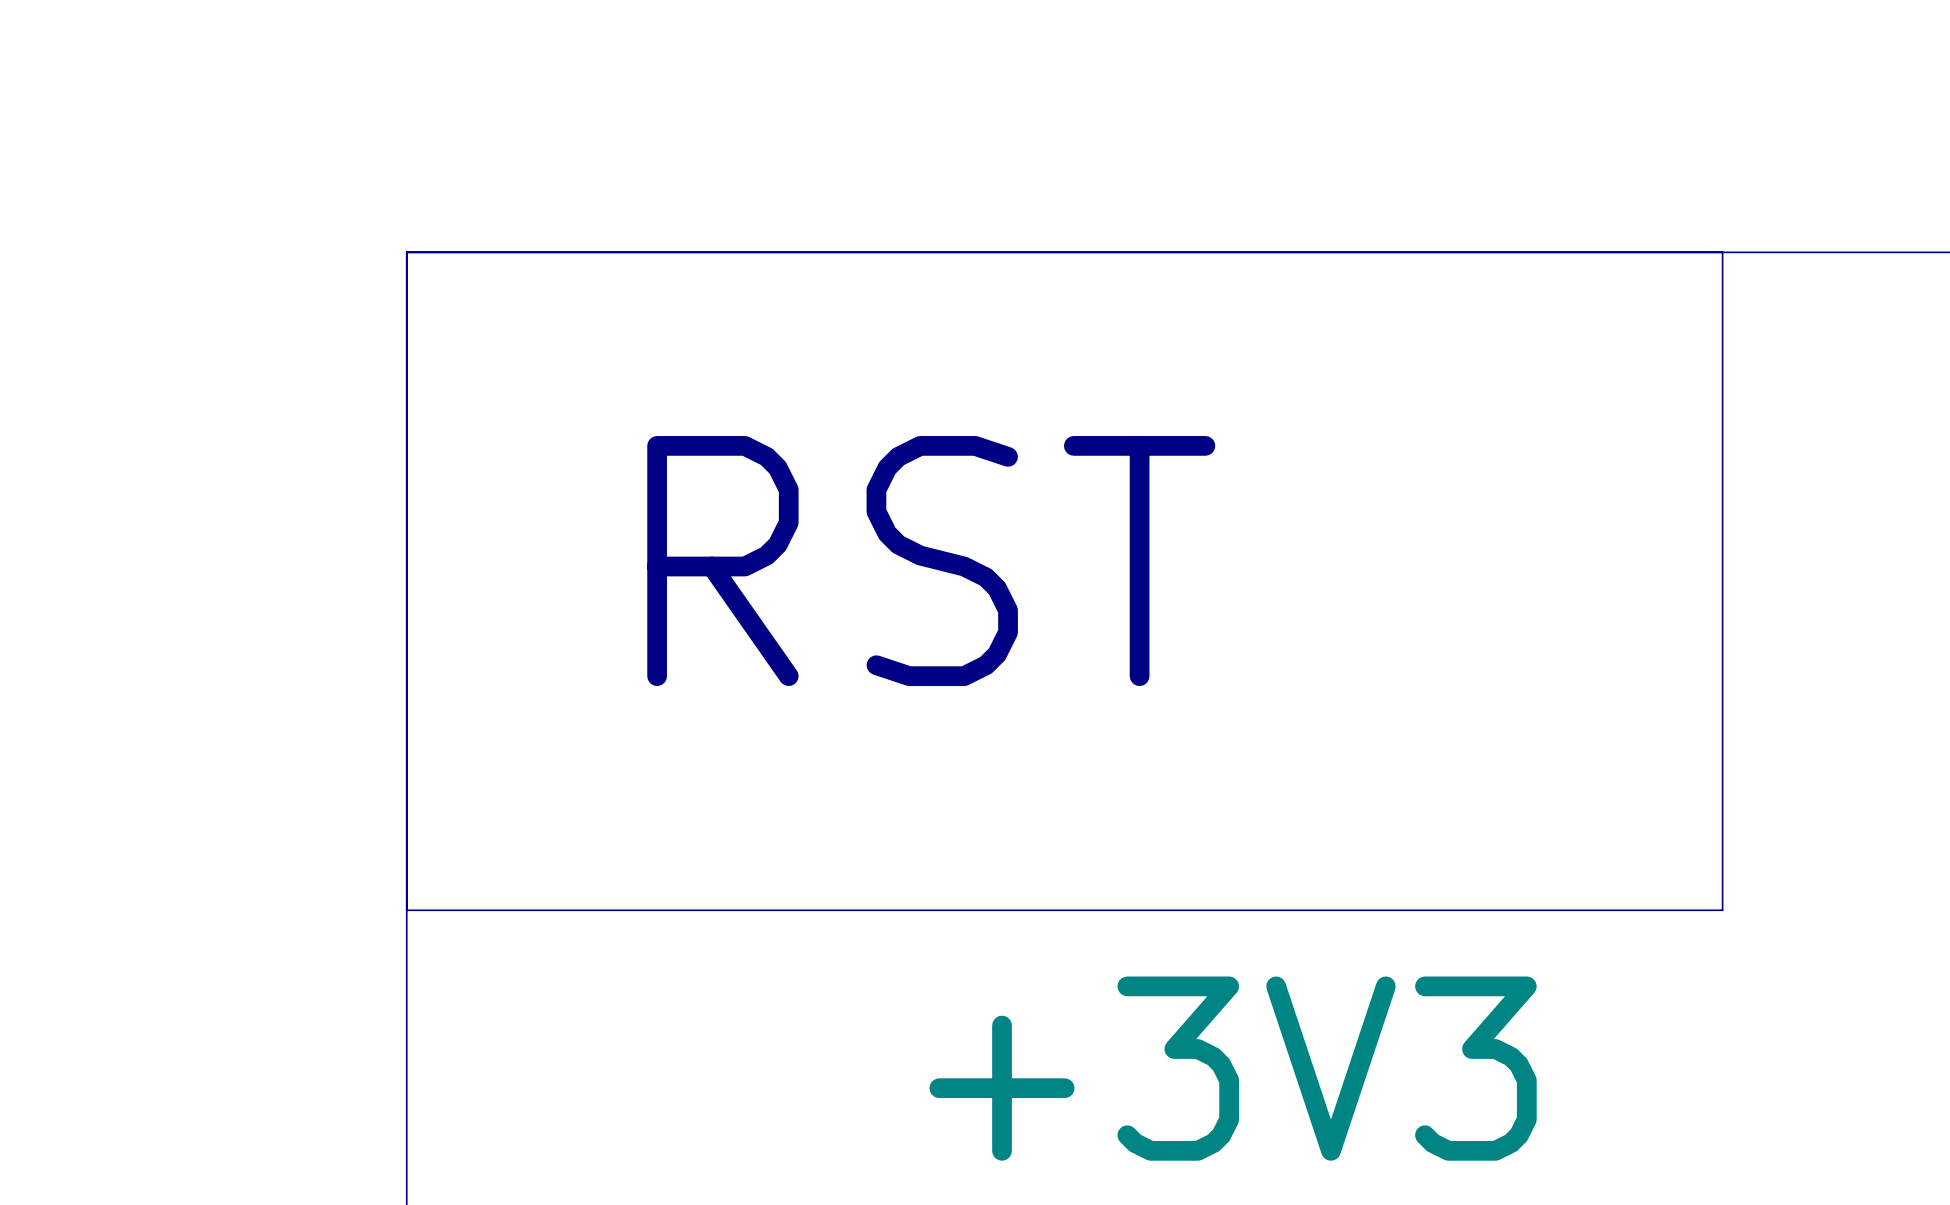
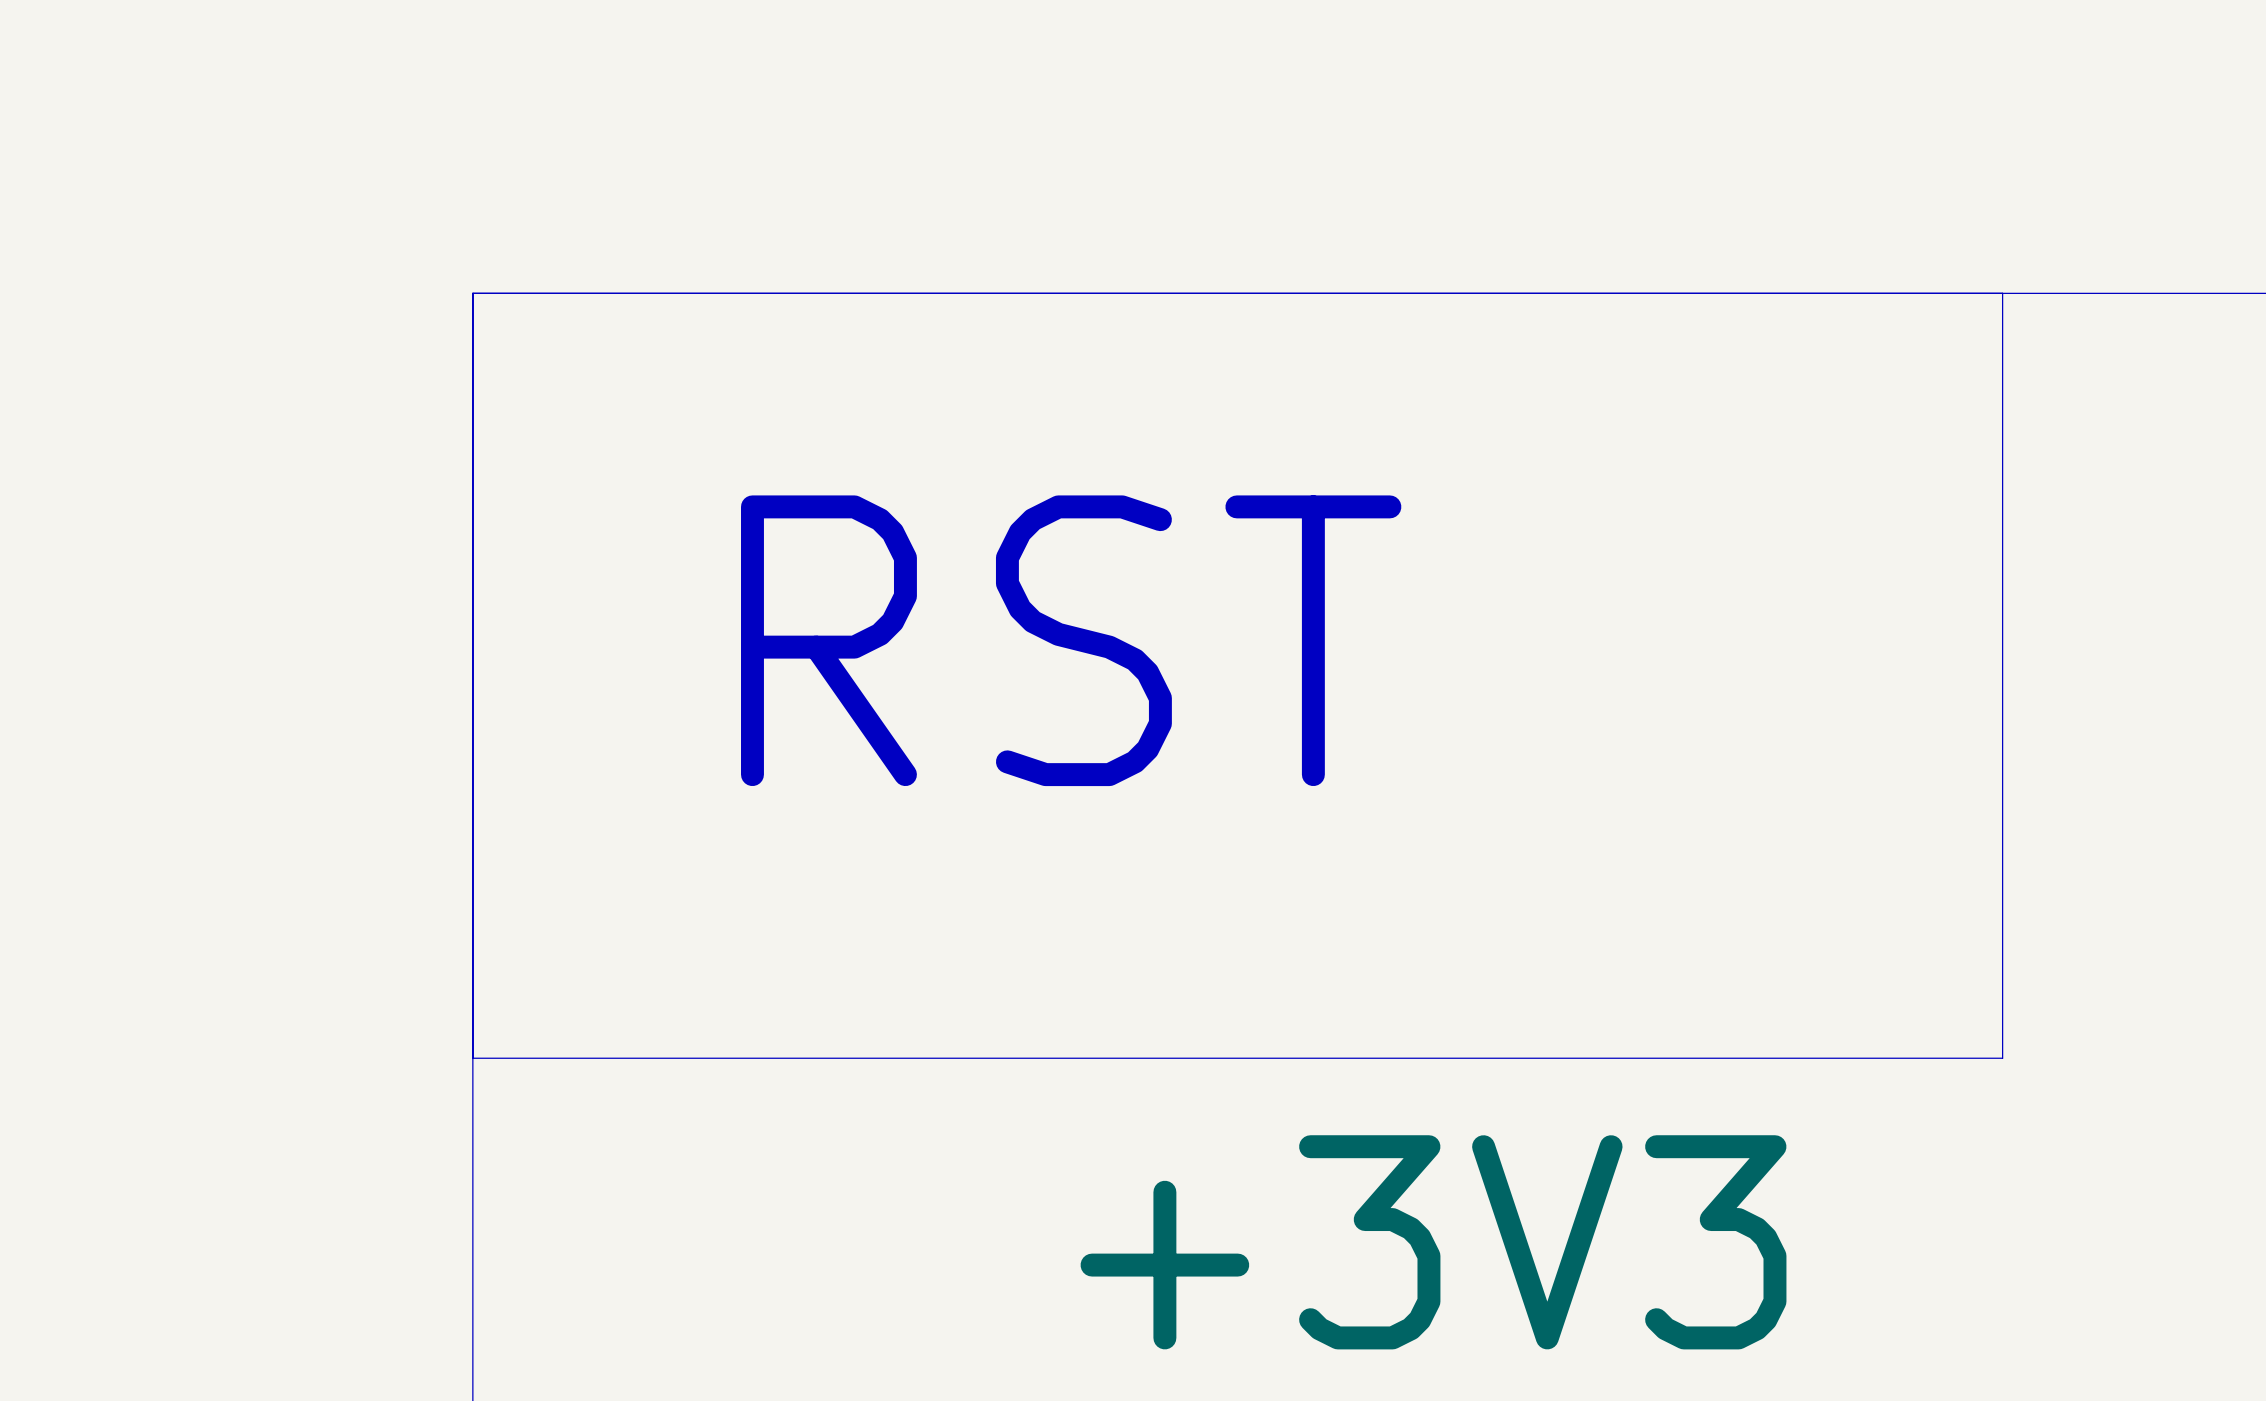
text position: RST (931, 561) -> RST (1071, 640)

